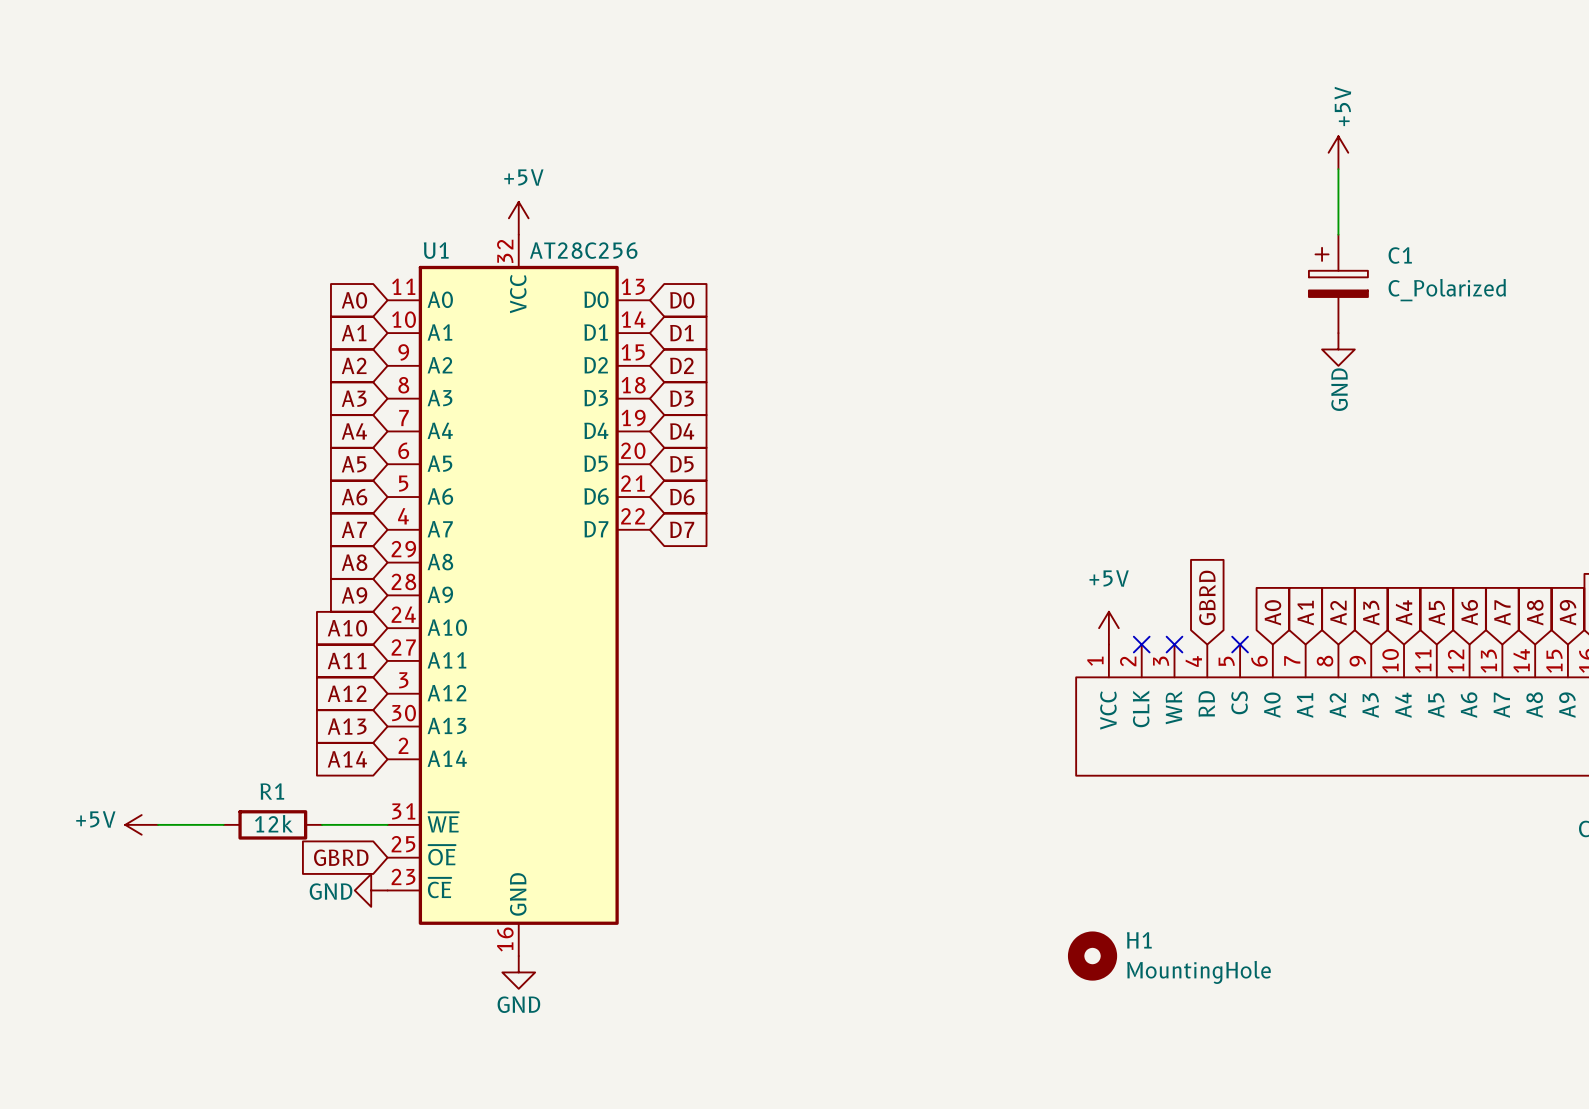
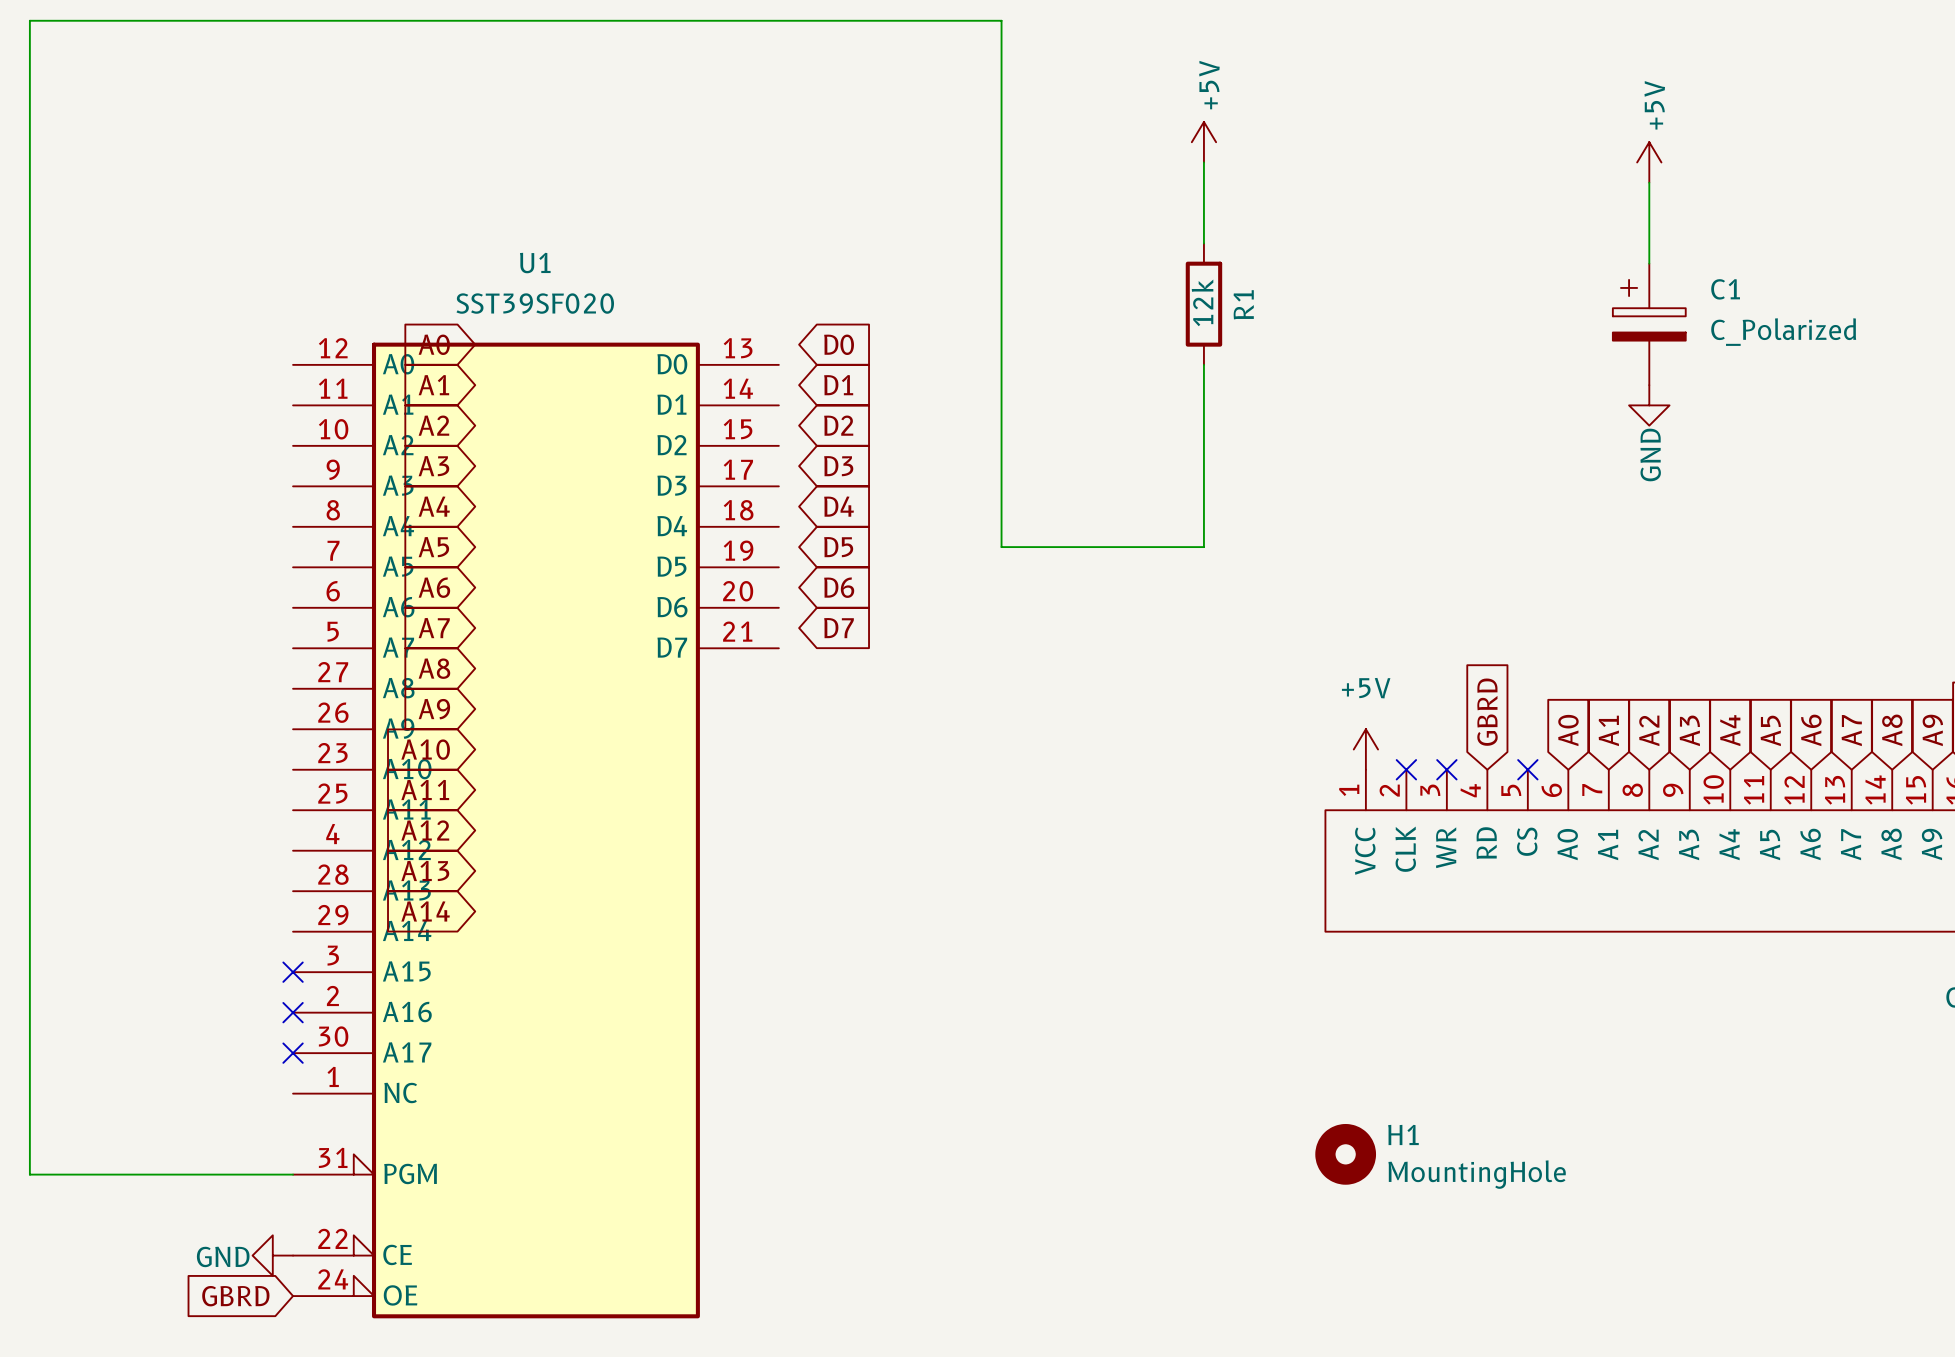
power symbol: none -> +5V (1203, 142)
wire: none -> (1203, 162) (1203, 243)
power symbol: +5V (518, 218) -> none
U1 symbol: [387, 234, 650, 957] -> [293, 342, 779, 1319]
U1 name position: U1 (436, 250) -> U1 (535, 263)
U1 value: AT28C256 (583, 250) -> SST39SF020 (535, 303)
wire: none -> (1203, 364) (1203, 547) (1001, 547) (1001, 20) (29, 20) (29, 1174) (293, 1174)
no-connect mark: none -> (293, 972)
power symbol: +5V (141, 824) -> none
wire: (158, 824) (223, 824) -> none
R1 rotation: 0° (272, 824) -> 90° clockwise (1203, 304)
R1 position: (272, 824) -> (1203, 304)
no-connect mark: none -> (293, 1012)
global label position: GBRD (341, 857) -> GBRD (235, 1296)
no-connect mark: none -> (293, 1053)
power symbol: GND (371, 890) -> none
power symbol: GND (518, 972) -> none
power symbol: none -> GND (272, 1255)

